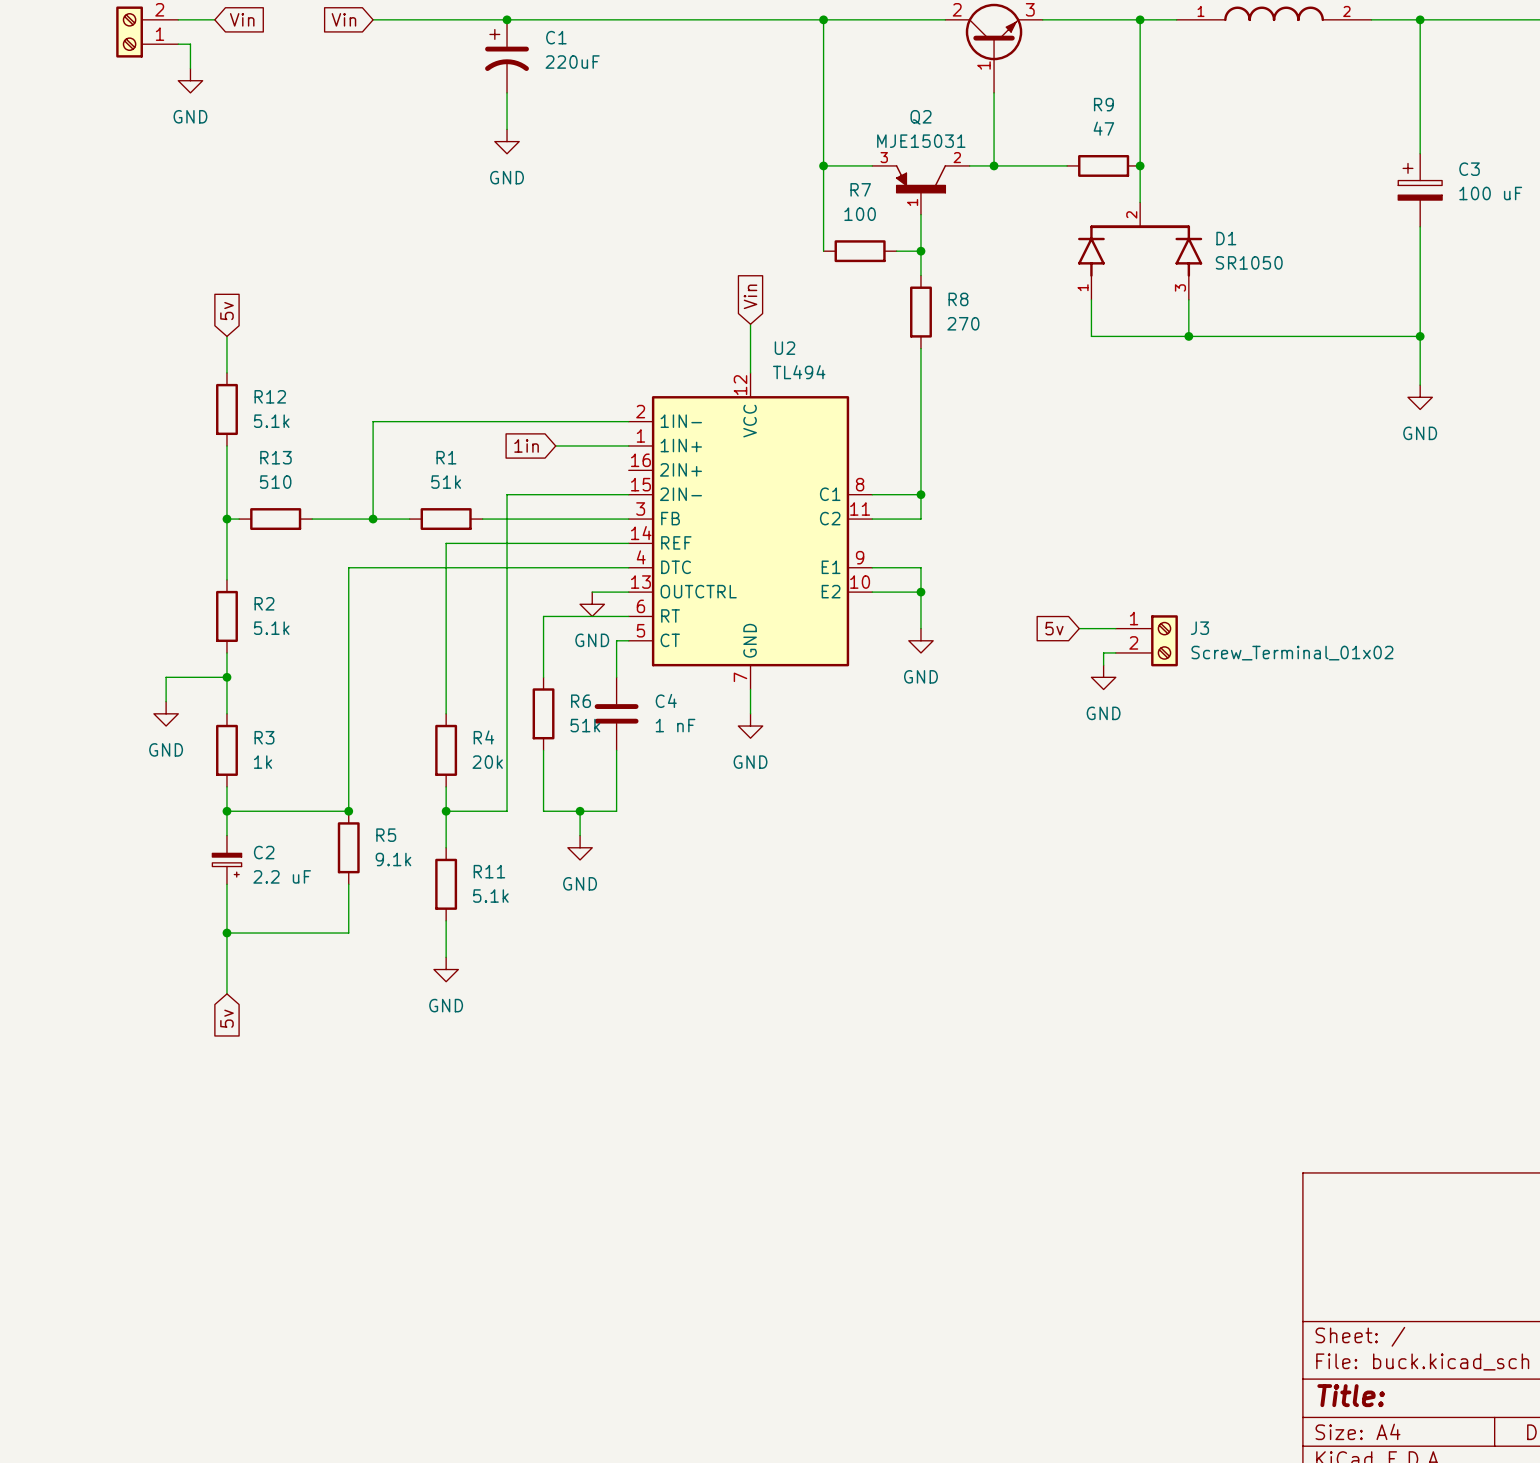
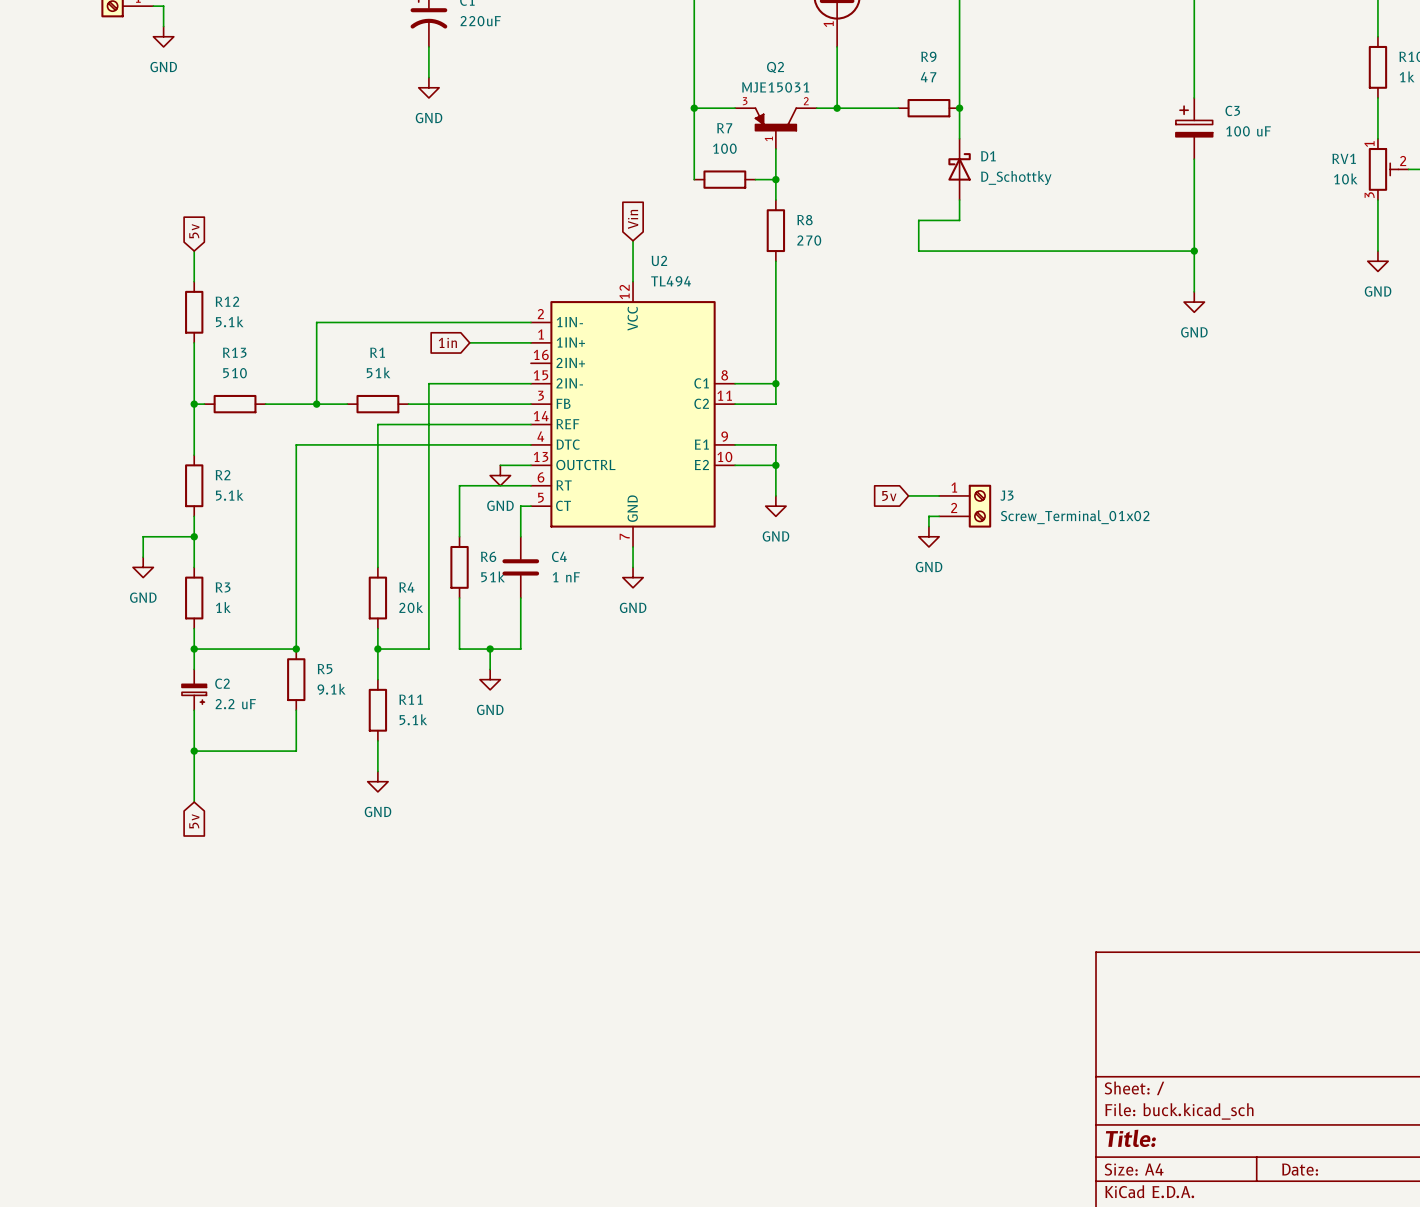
D1 symbol: [1078, 202, 1203, 300] -> [948, 138, 971, 201]
D1 name position: D1 (1226, 238) -> D1 (988, 156)
D1 value: SR1050 (1249, 262) -> D_Schottky (1016, 177)
wire: none -> (959, 200) (959, 220) (918, 220)
wire: (1188, 299) (1188, 336) -> none
junction: (1188, 336) -> none

